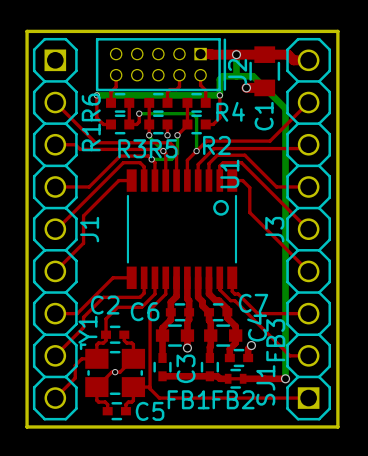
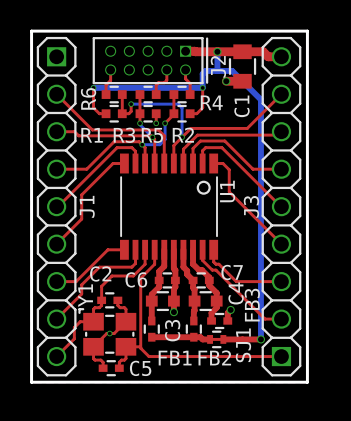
R1 name rotation: 0° (91, 137) -> 90° clockwise (92, 135)
R2 name position: R2 (216, 145) -> R2 (183, 135)
U1 name position: U1 (229, 173) -> U1 (227, 191)

